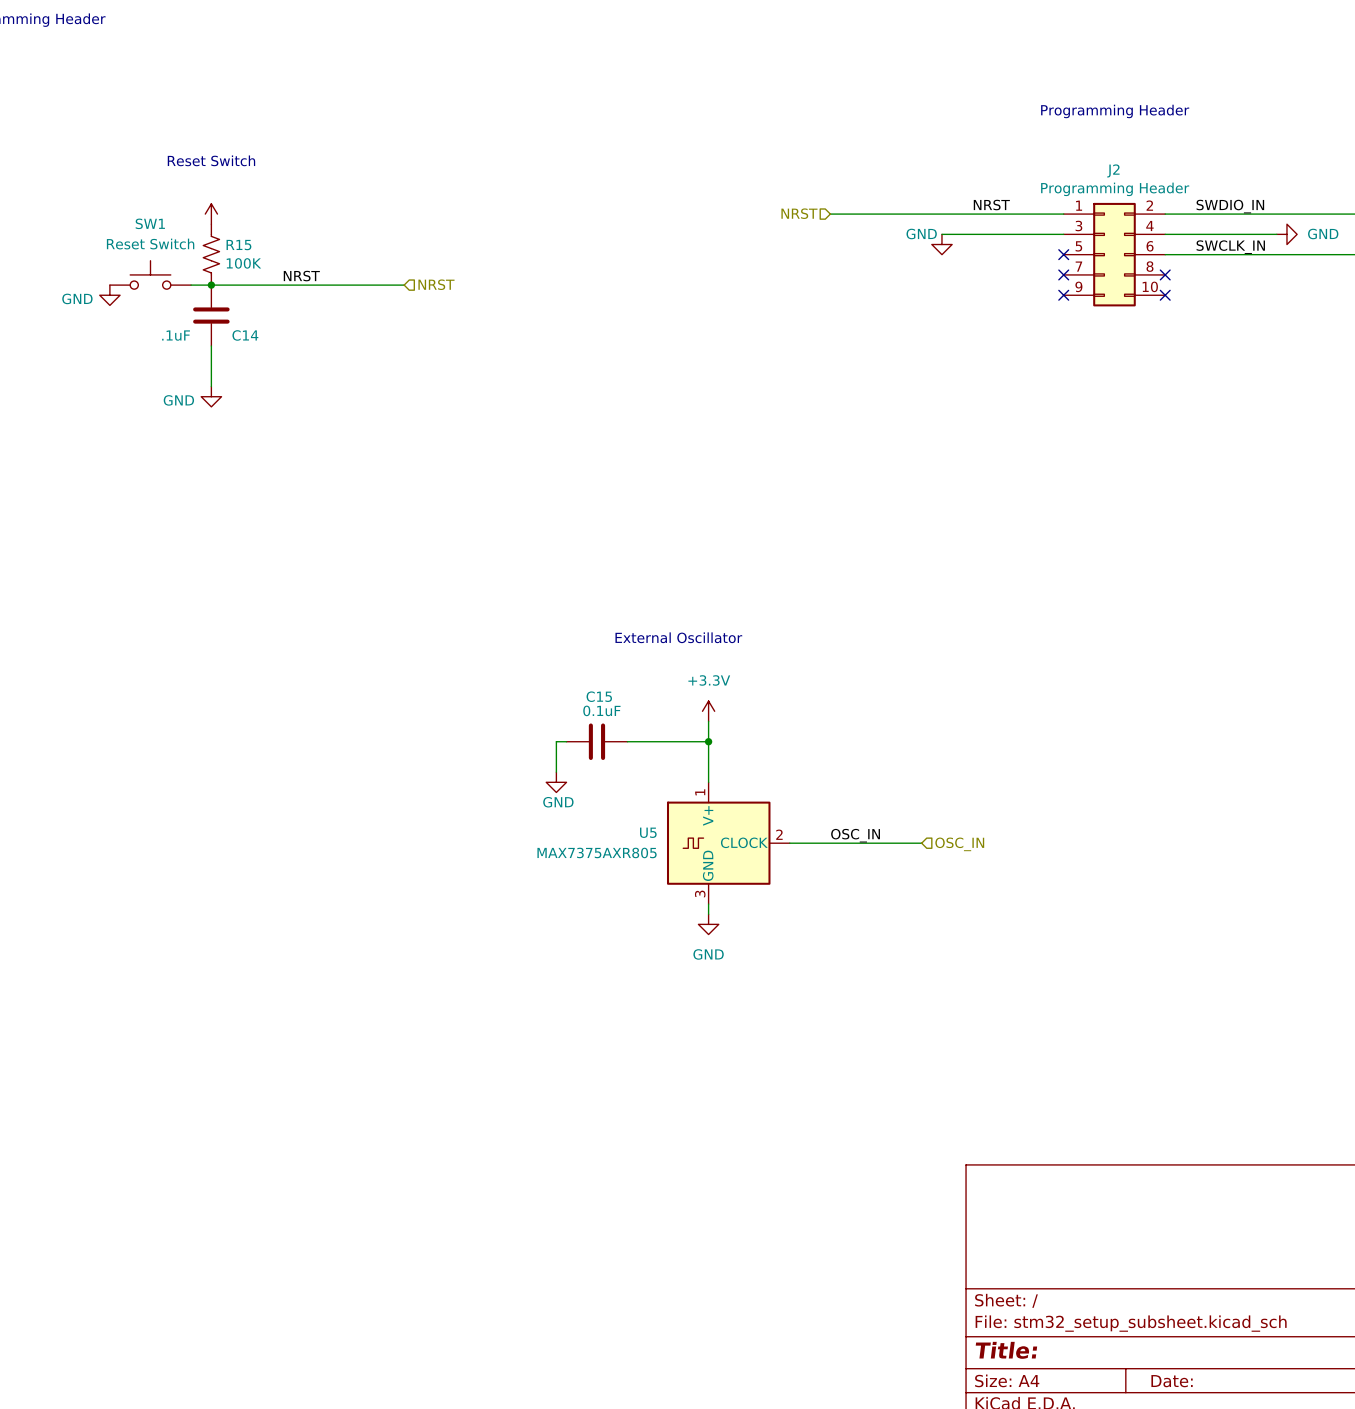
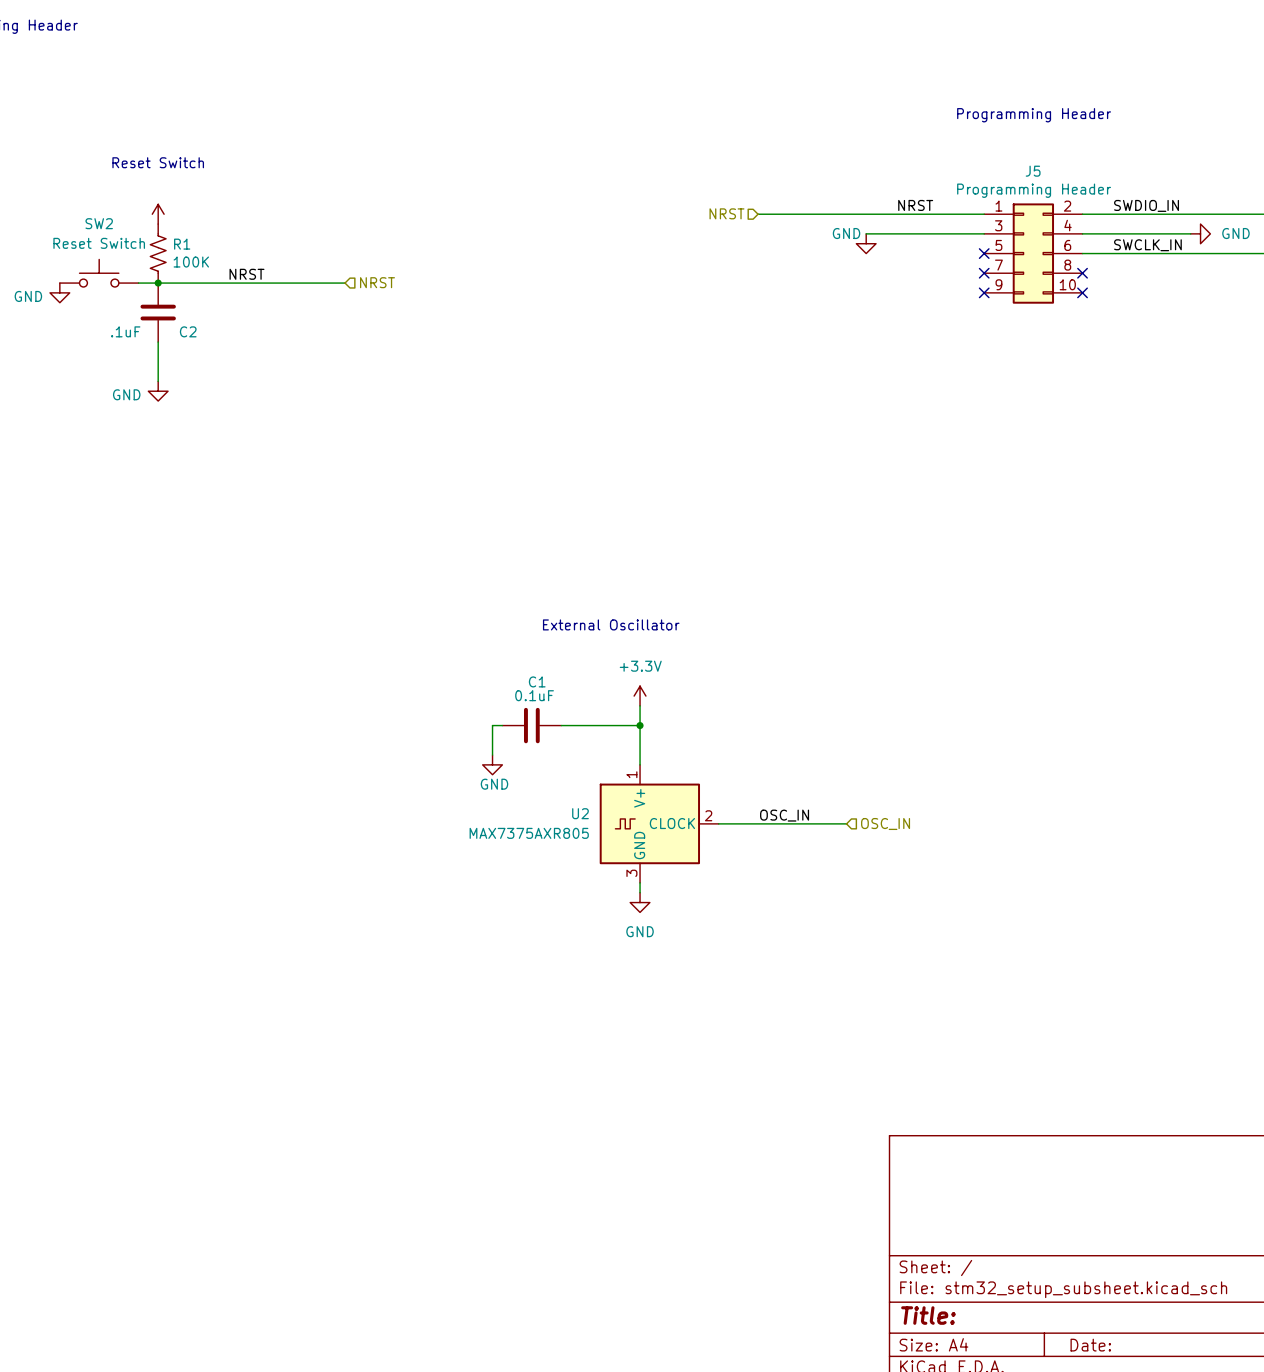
J2 name: J2 (1113, 170) -> J5 (1033, 171)
SW1 name: SW1 (150, 223) -> SW2 (99, 223)
R15 name: R15 (238, 245) -> R1 (182, 244)
C14 name: C14 (245, 335) -> C2 (188, 331)
C15 name: C15 (599, 696) -> C1 (537, 681)
U5 name: U5 (648, 832) -> U2 (580, 813)

